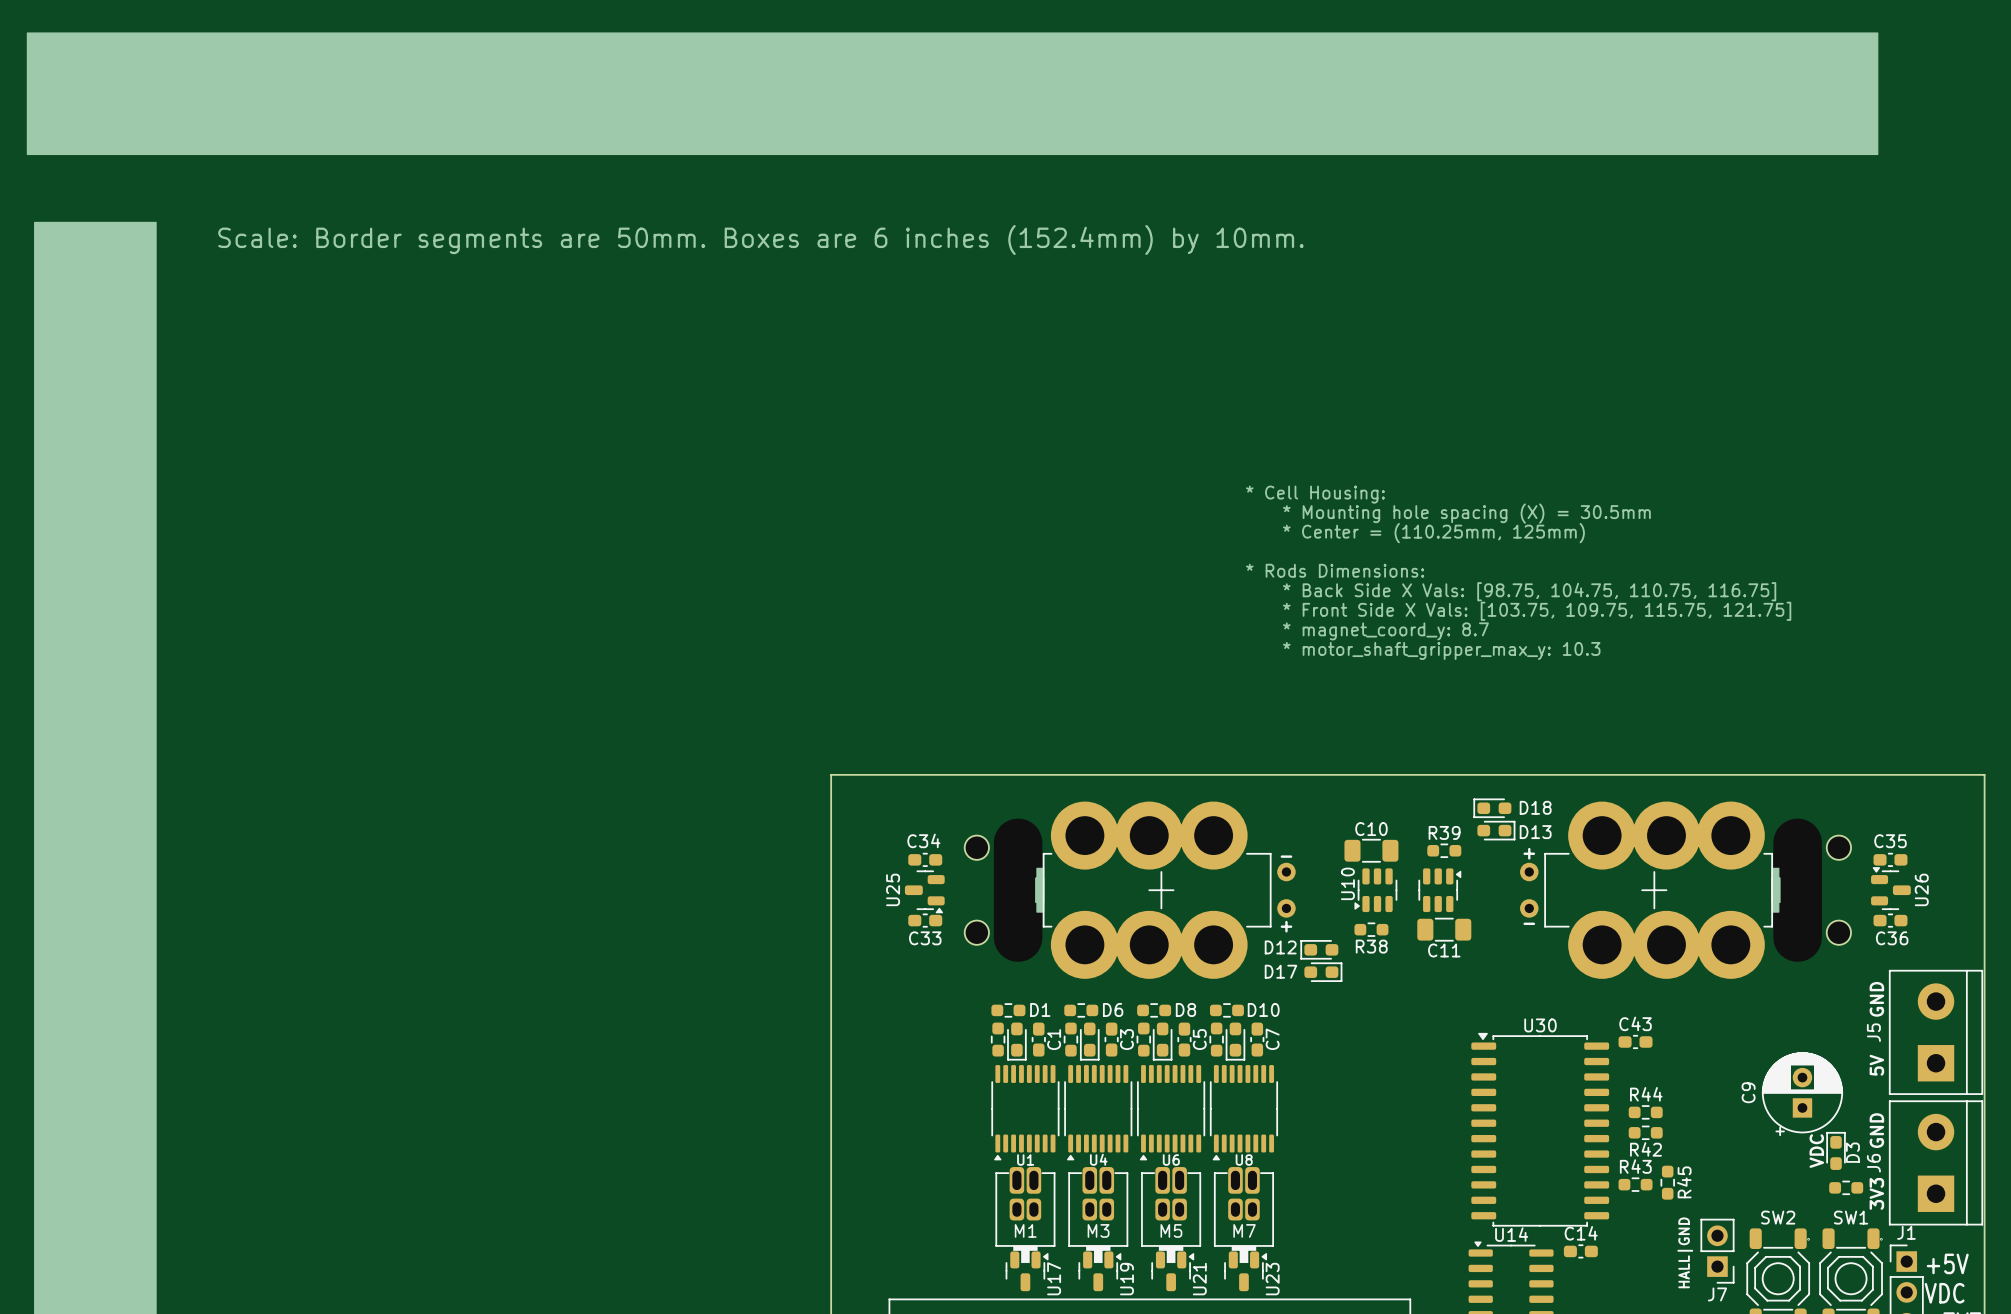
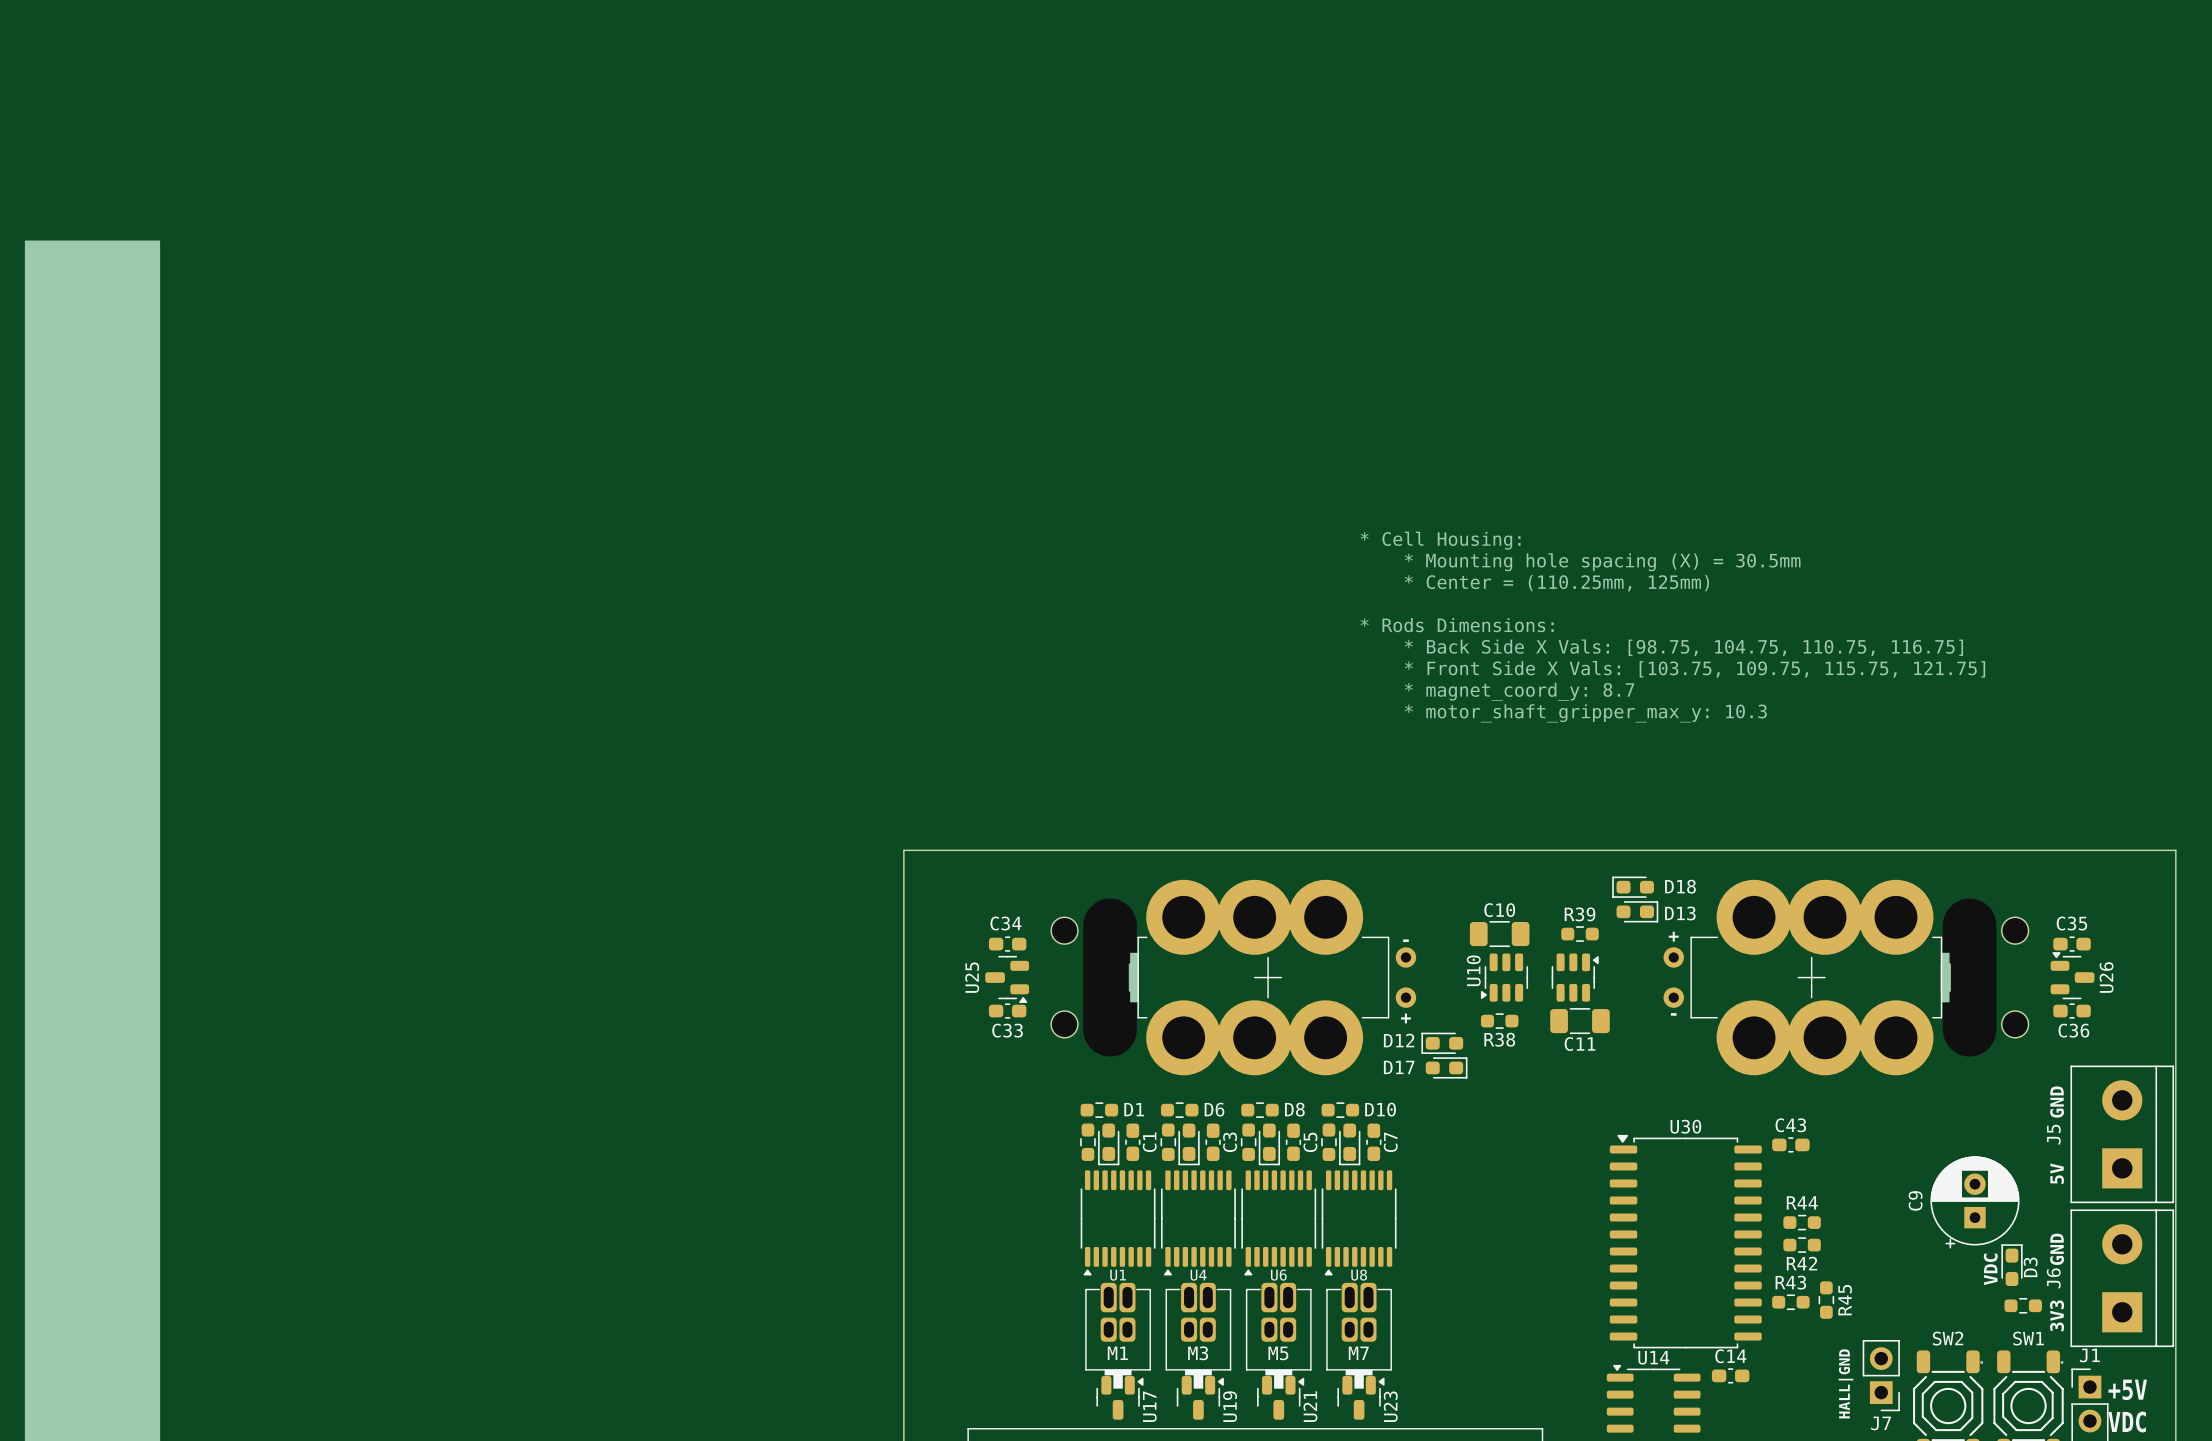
drawing: [26, 32, 1879, 156] -> none
text: Scale: Border segments are 50mm. Boxes are 6 inches (152.4mm) by 10mm. (760, 239) -> none

